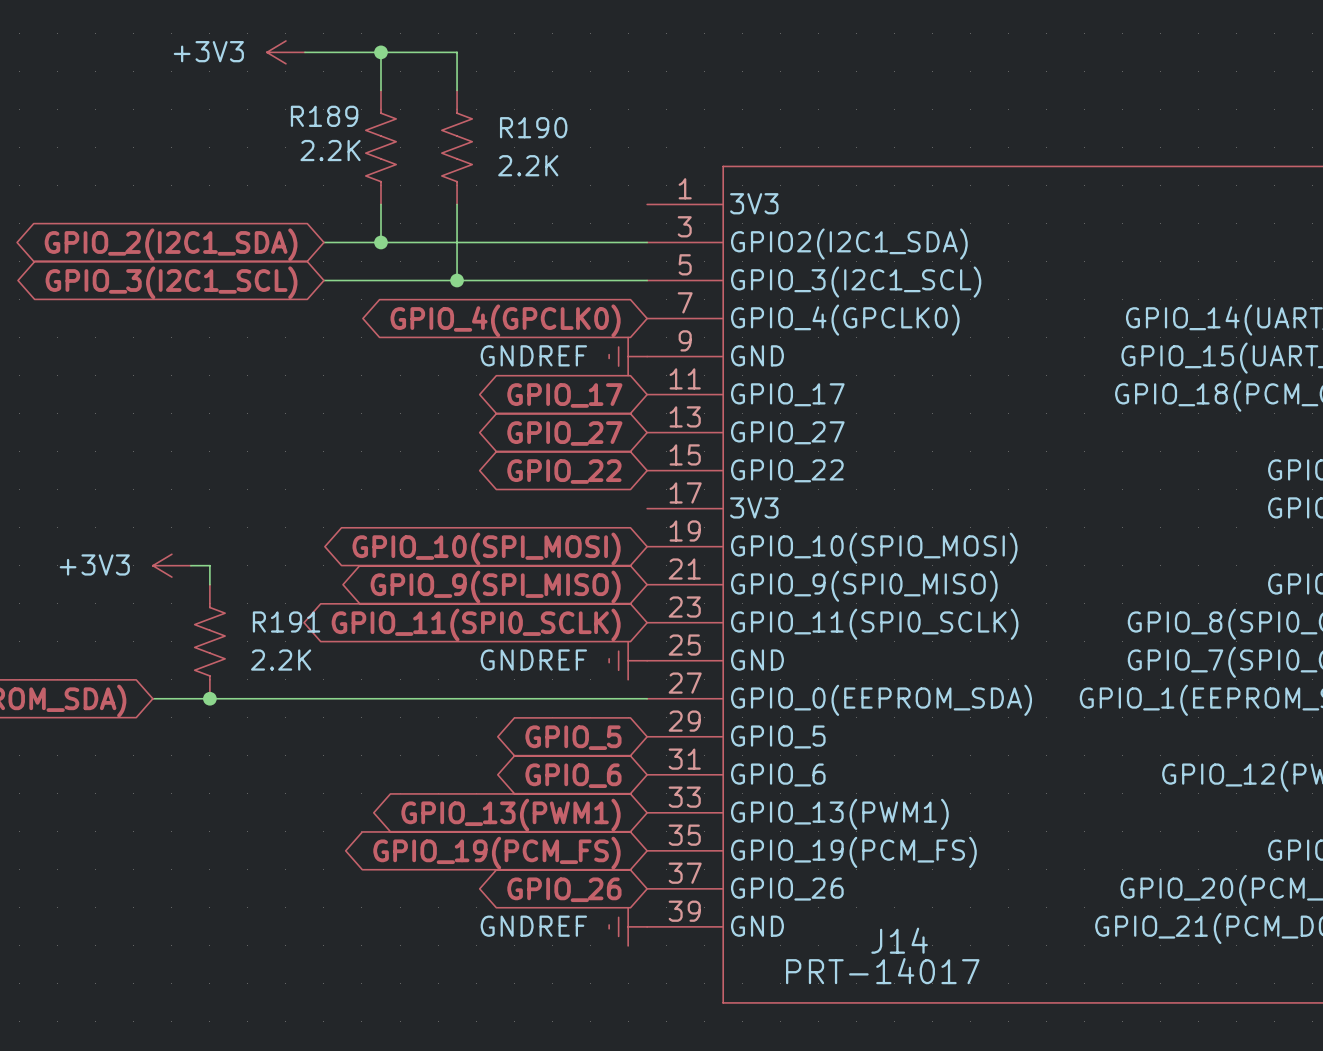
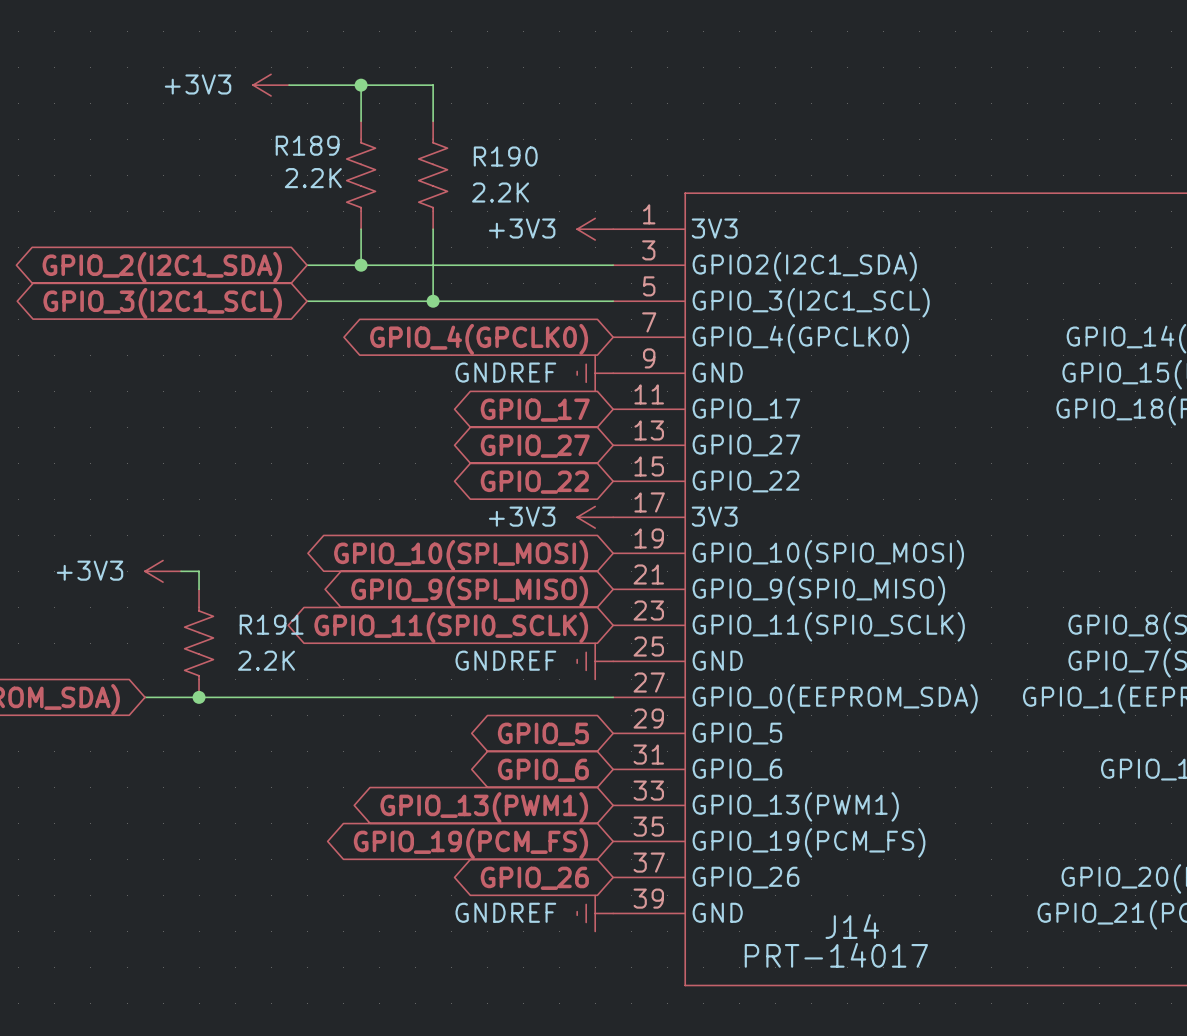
power symbol: none -> +3V3 (595, 229)
power symbol: none -> +3V3 (595, 517)

